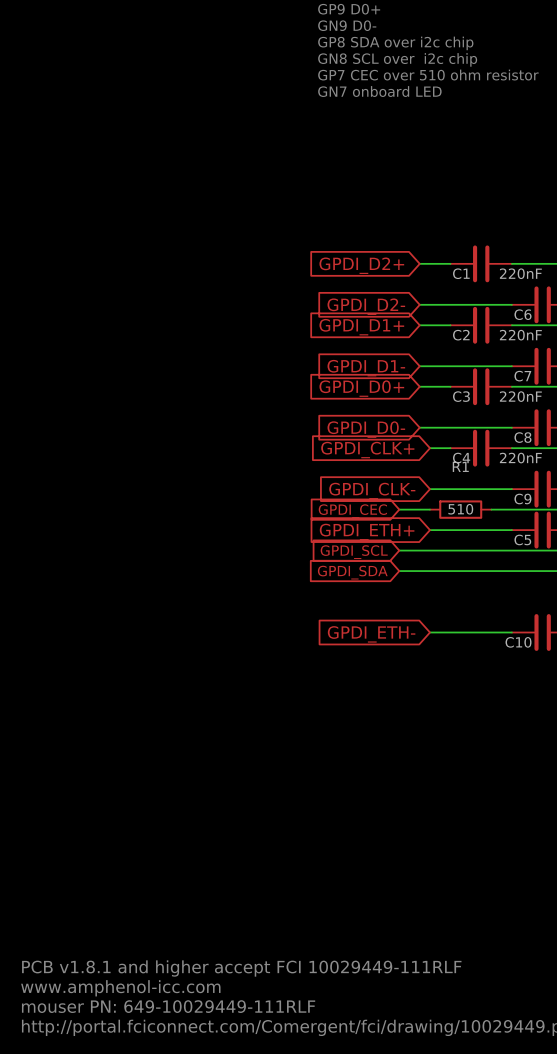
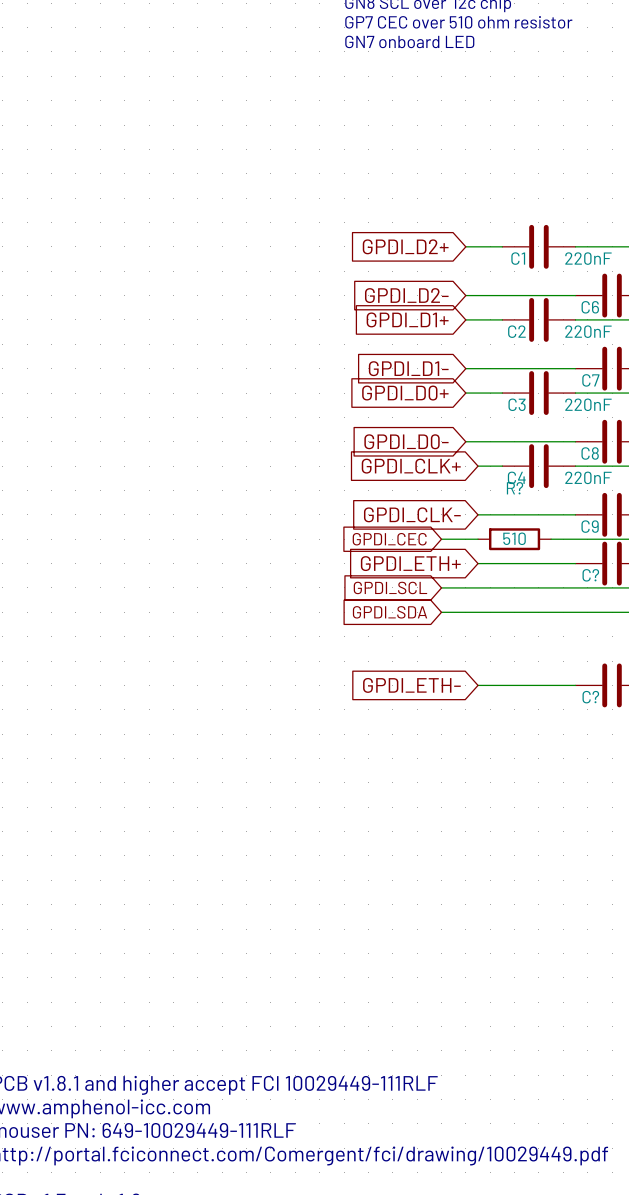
R1 name: R1 (460, 466) -> R? (515, 488)
C5 name: C5 (522, 539) -> C? (590, 575)
C10 name: C10 (518, 642) -> C? (590, 697)

